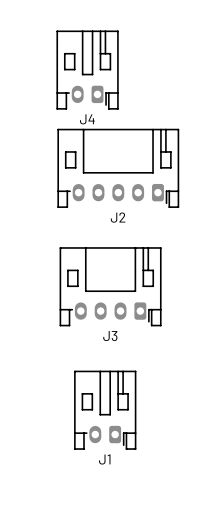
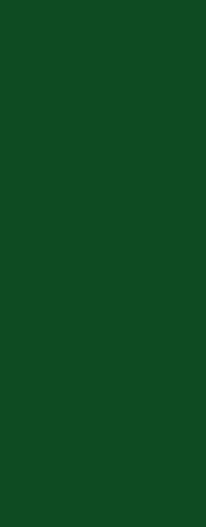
J4: (87, 70) -> none
J2: (118, 168) -> none
J3: (110, 286) -> none
J1: (105, 410) -> none

